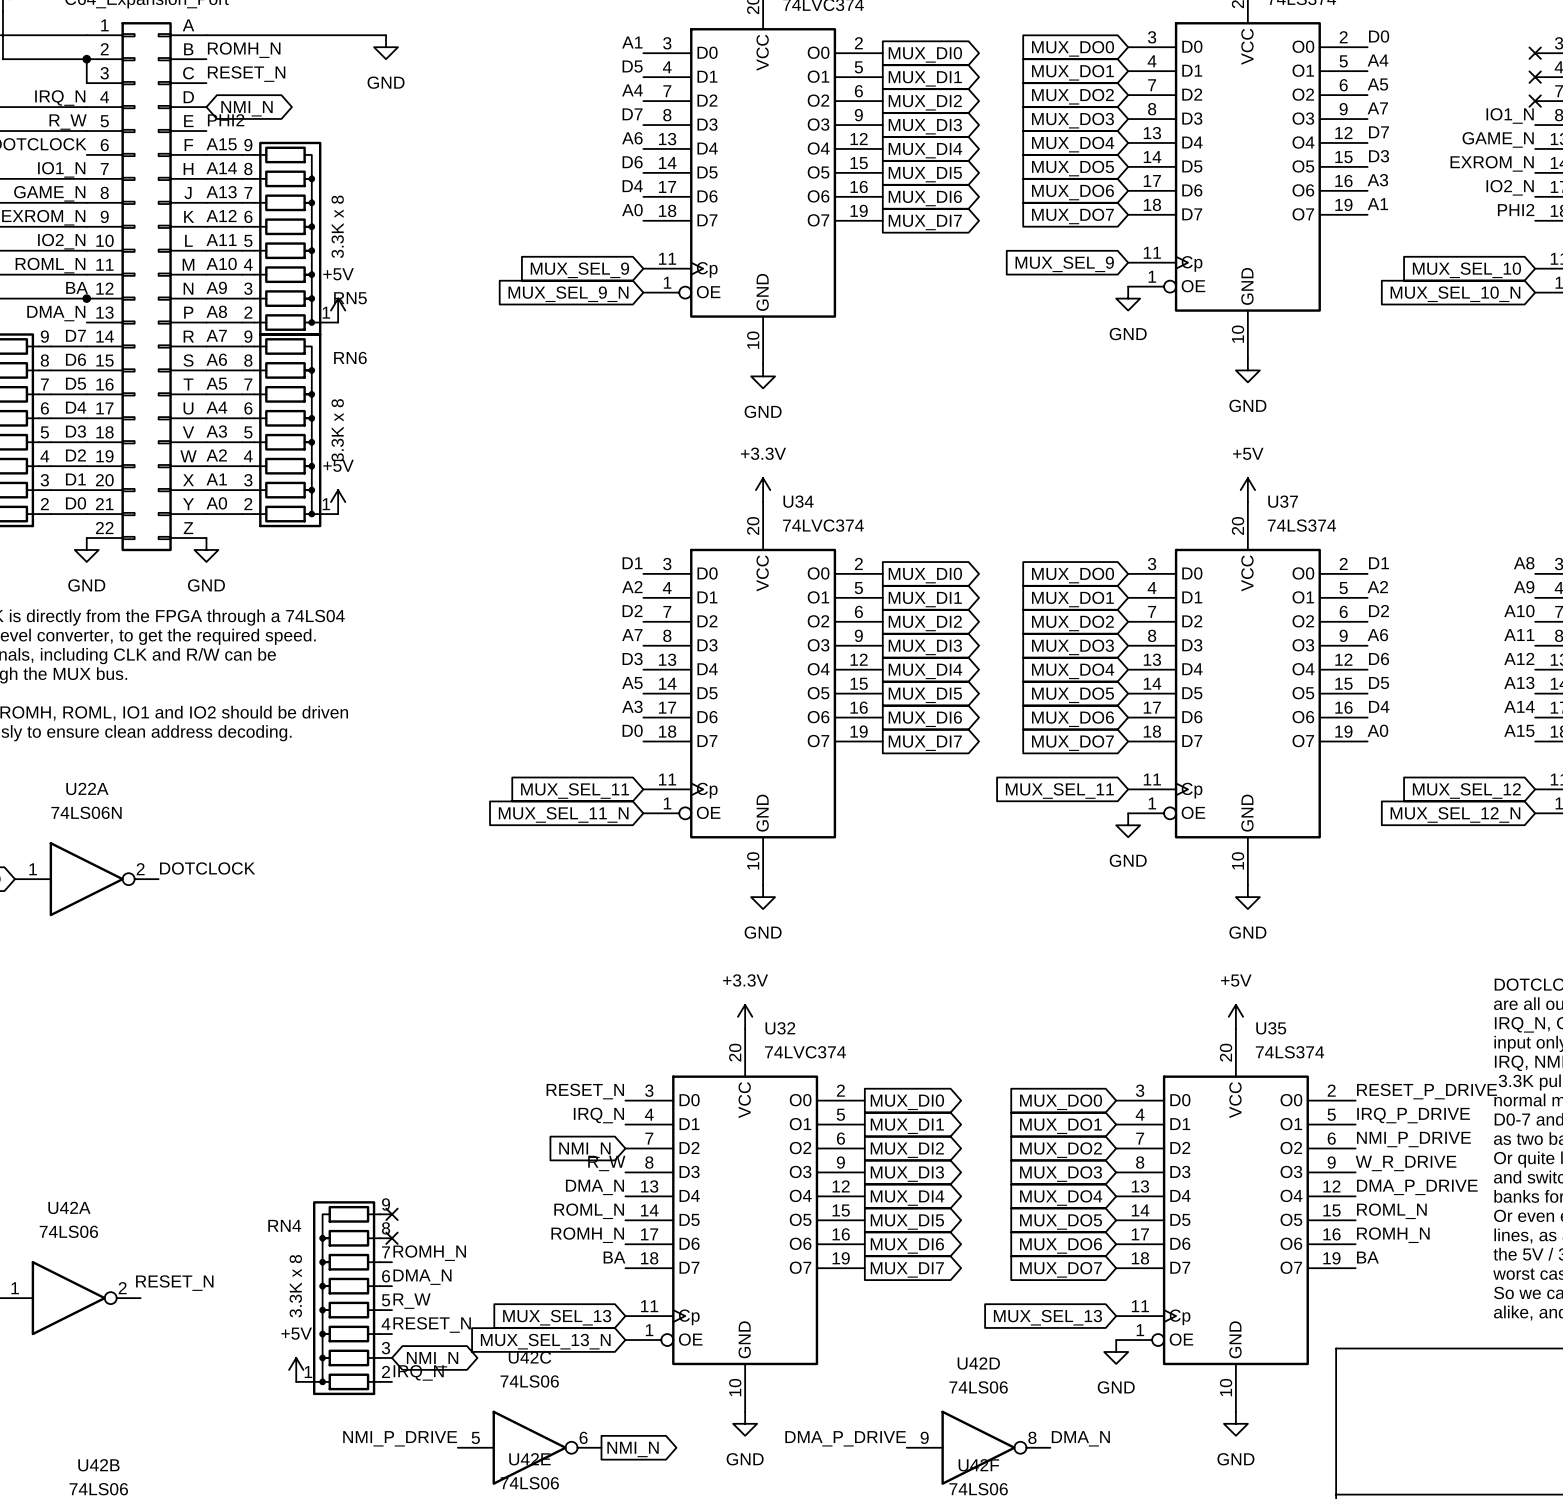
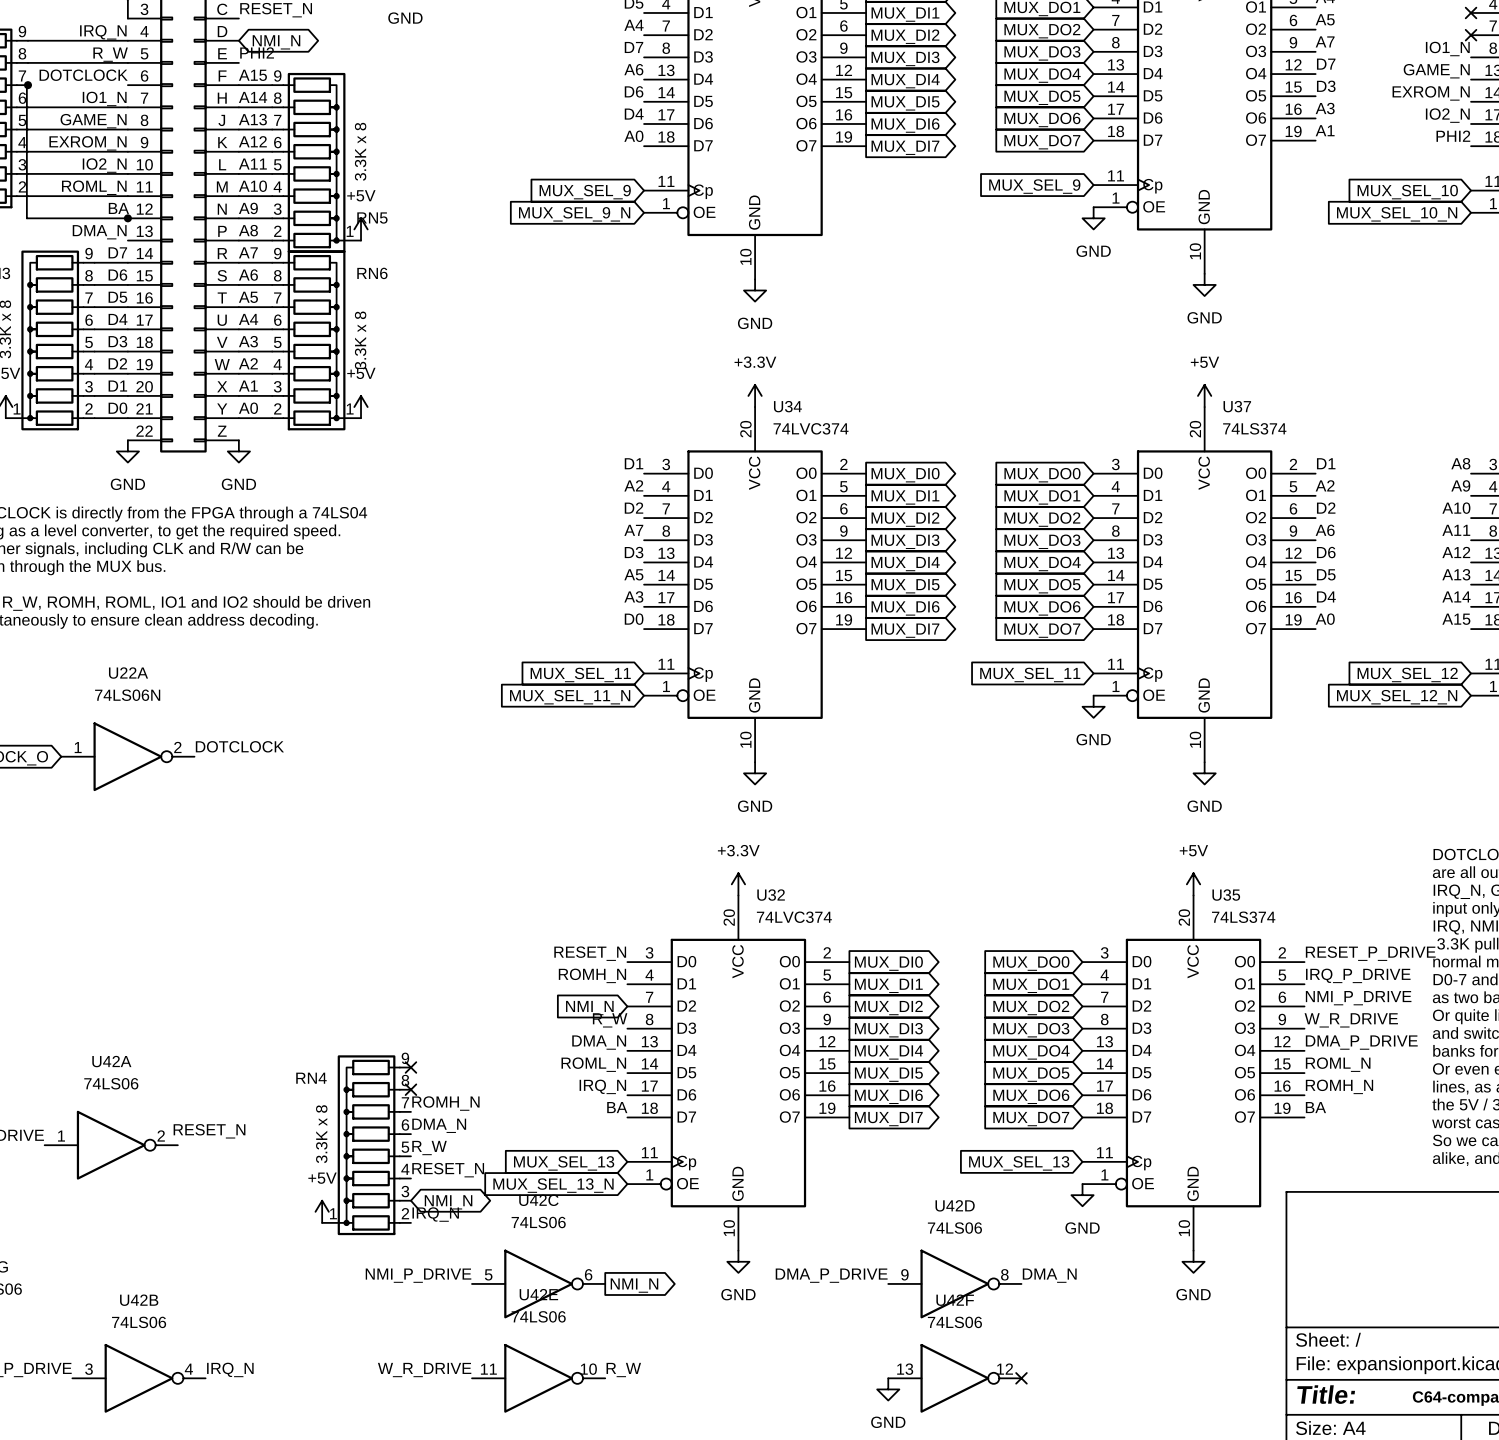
label: IRQ_N (598, 1115) -> ROMH_N (592, 975)
label: ROMH_N (587, 1235) -> IRQ_N (602, 1086)

